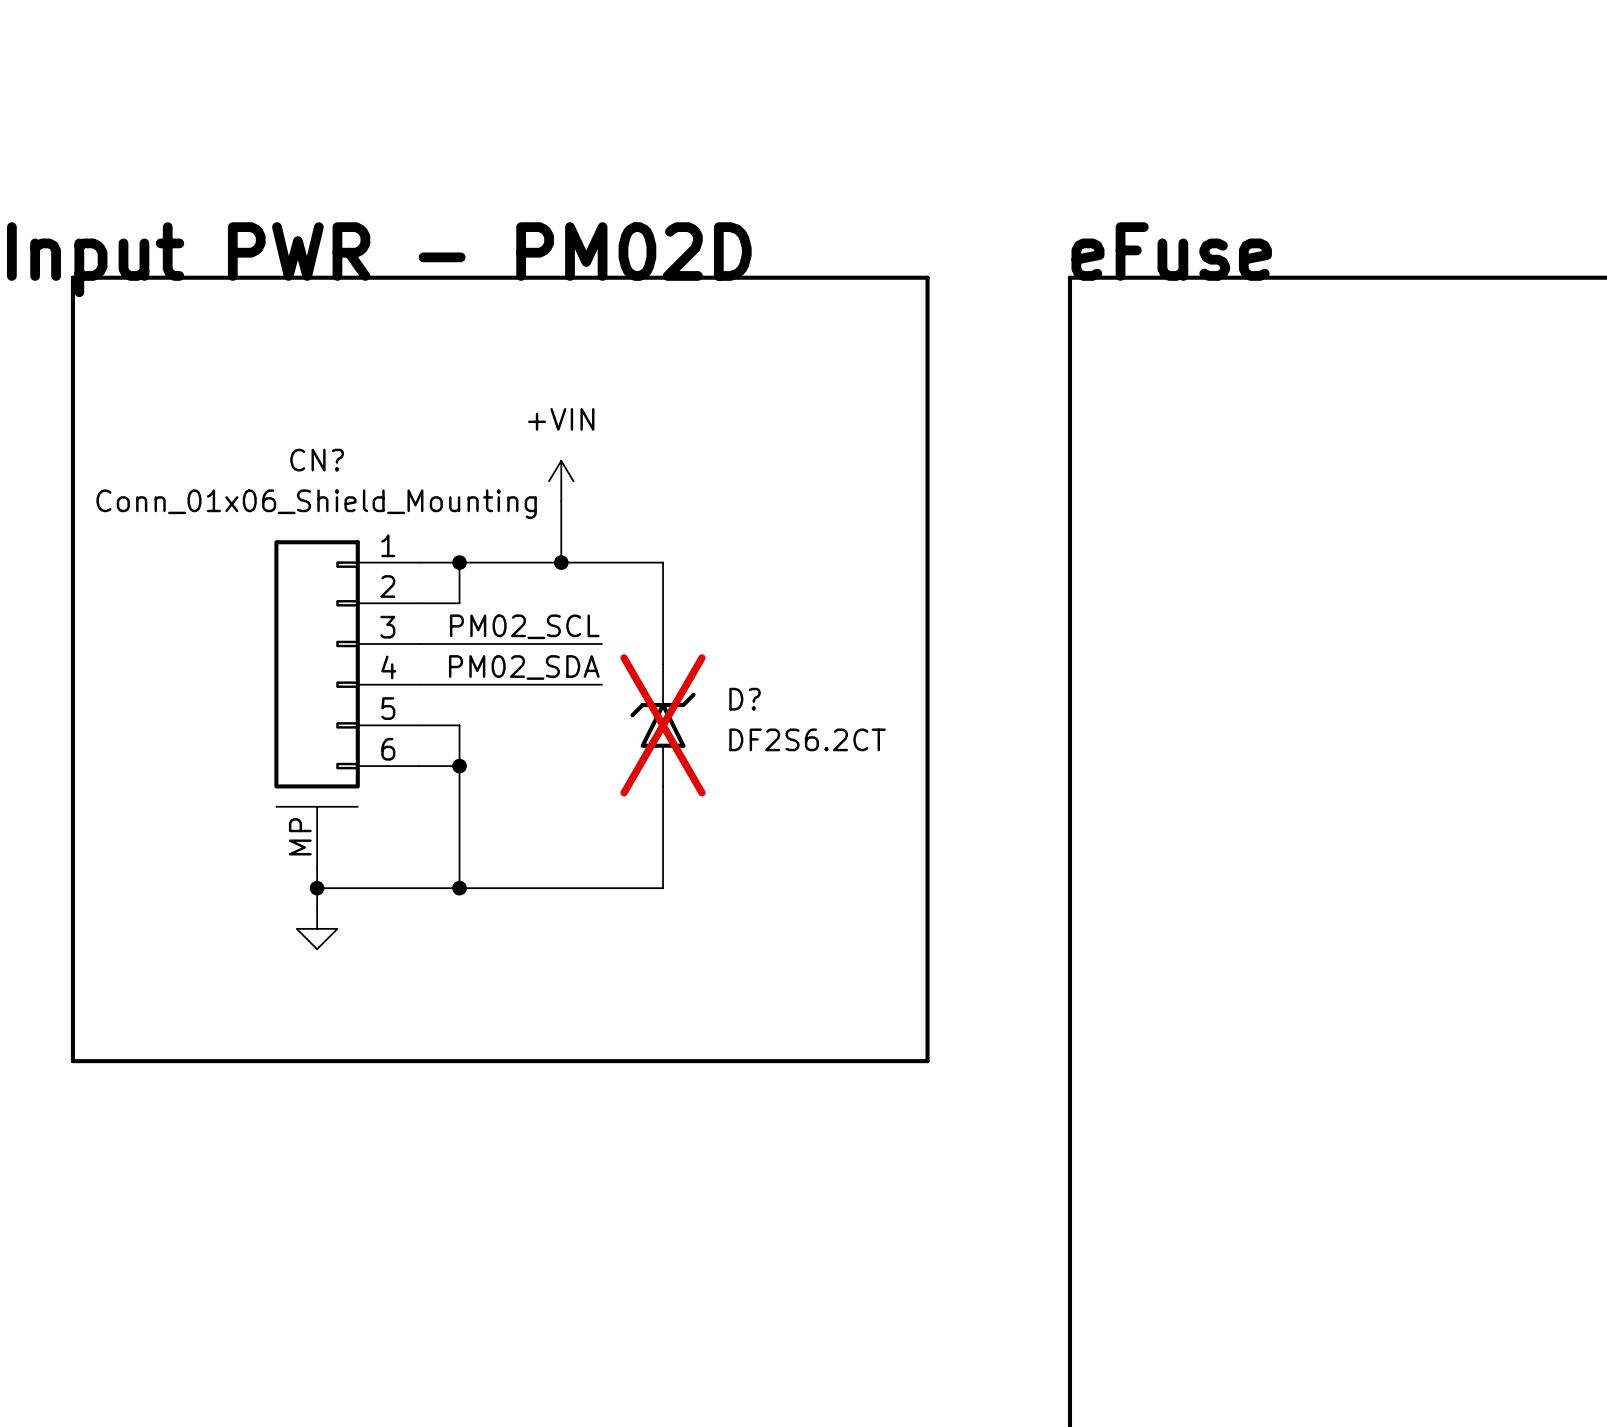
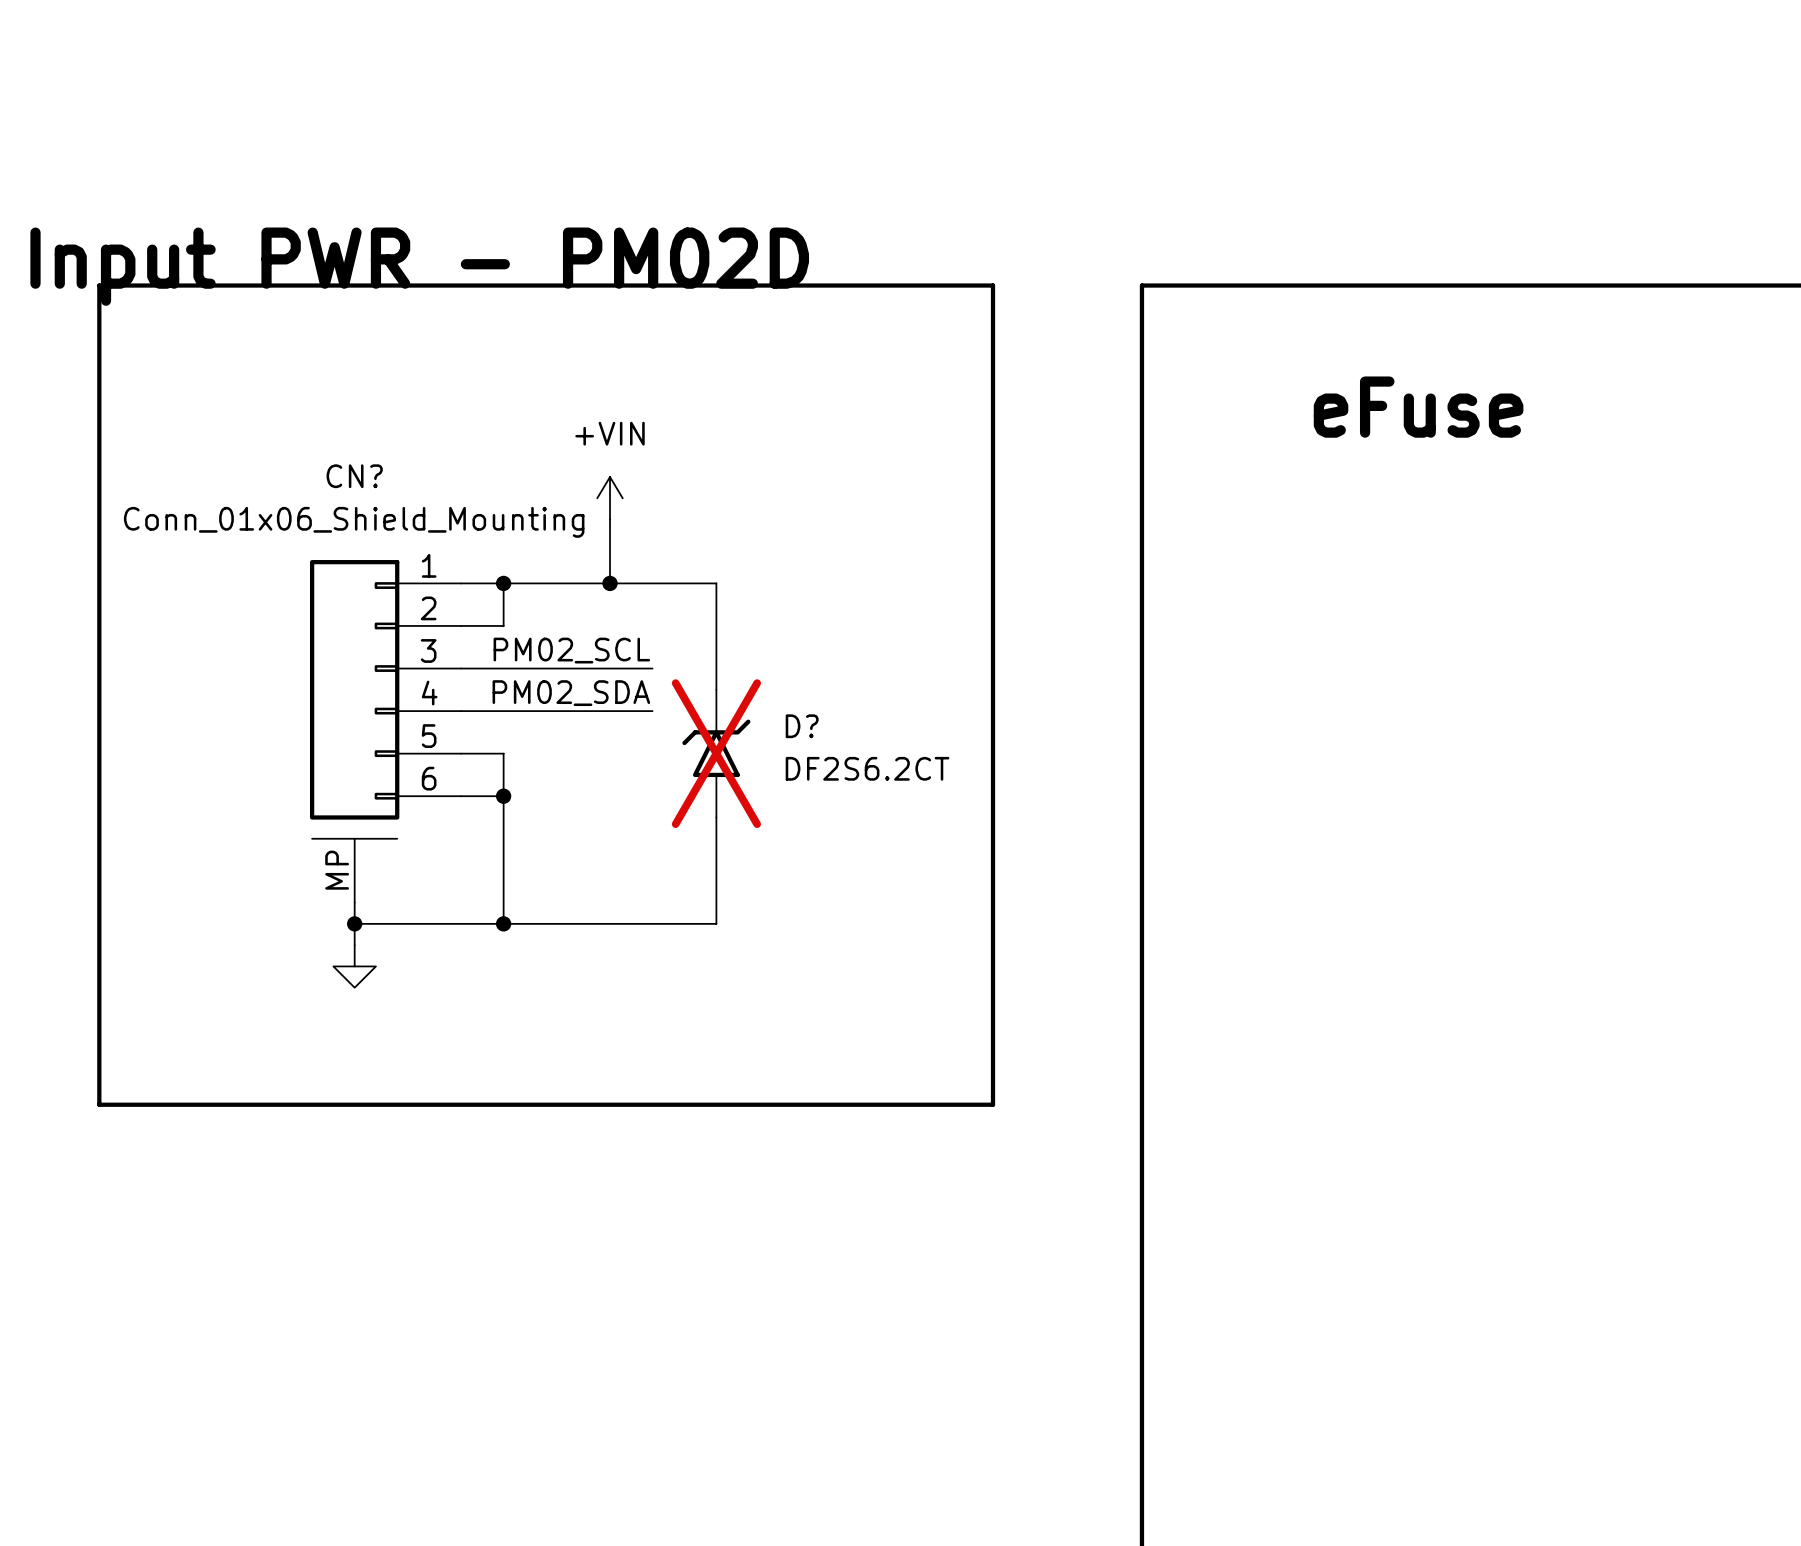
text position: eFuse (1171, 251) -> eFuse (1418, 407)

